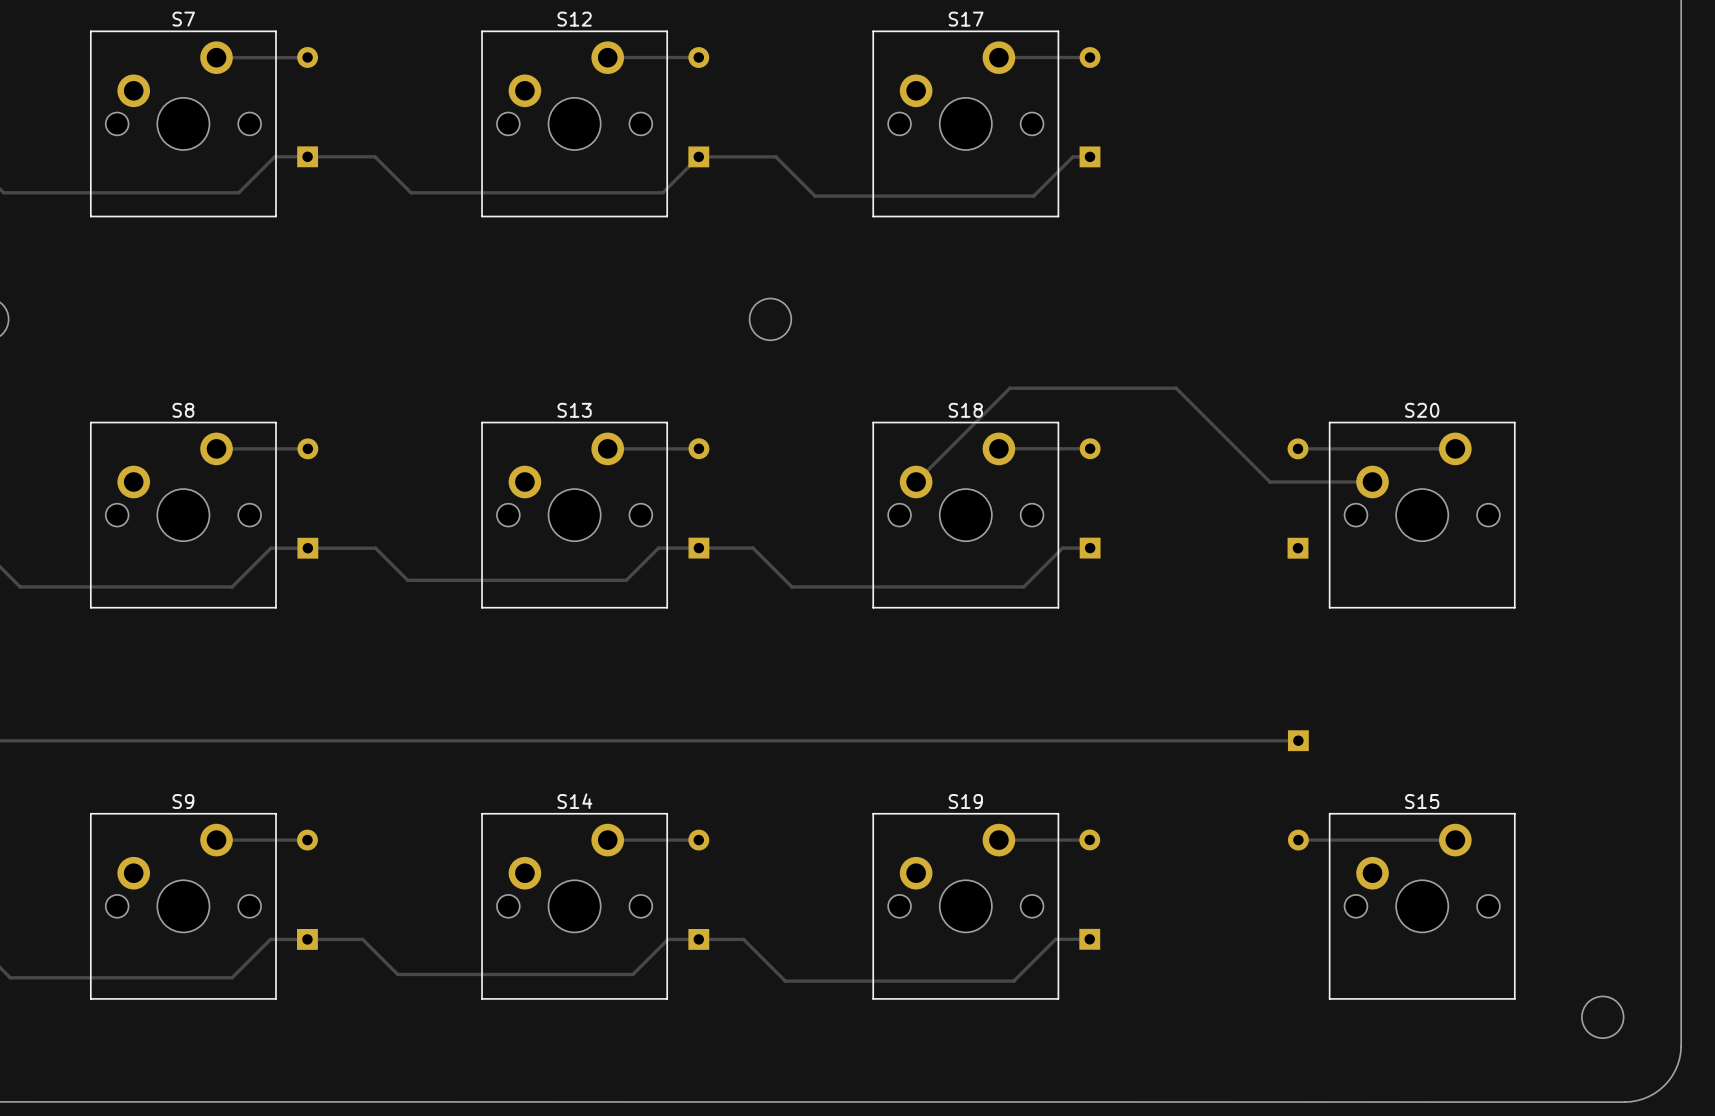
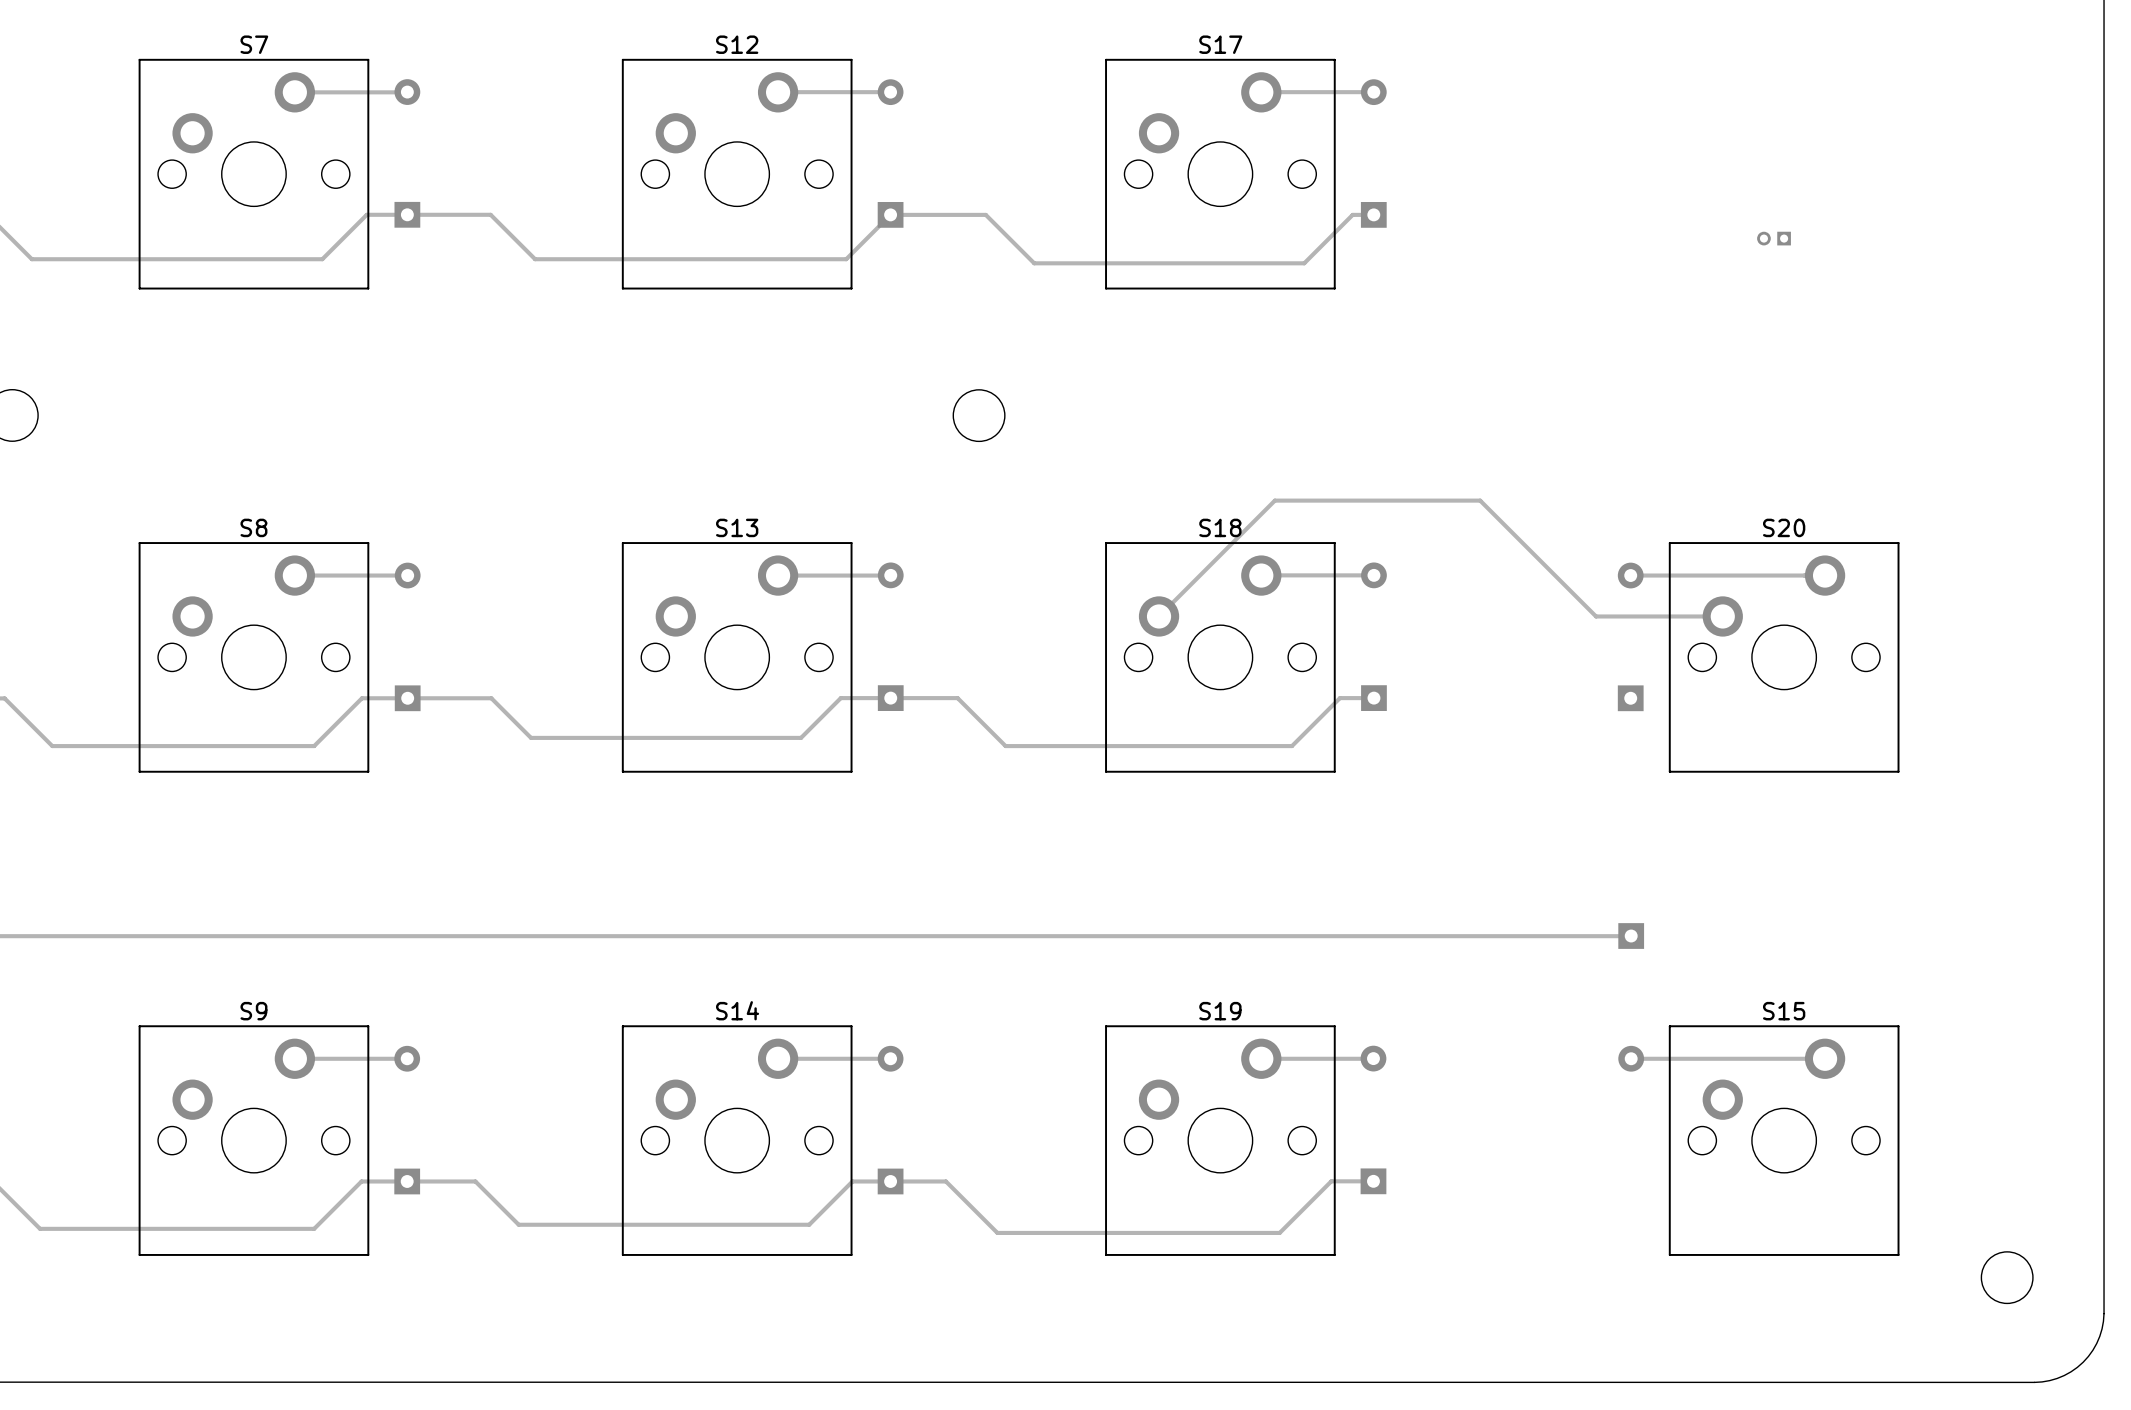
part: none -> (1774, 238)

